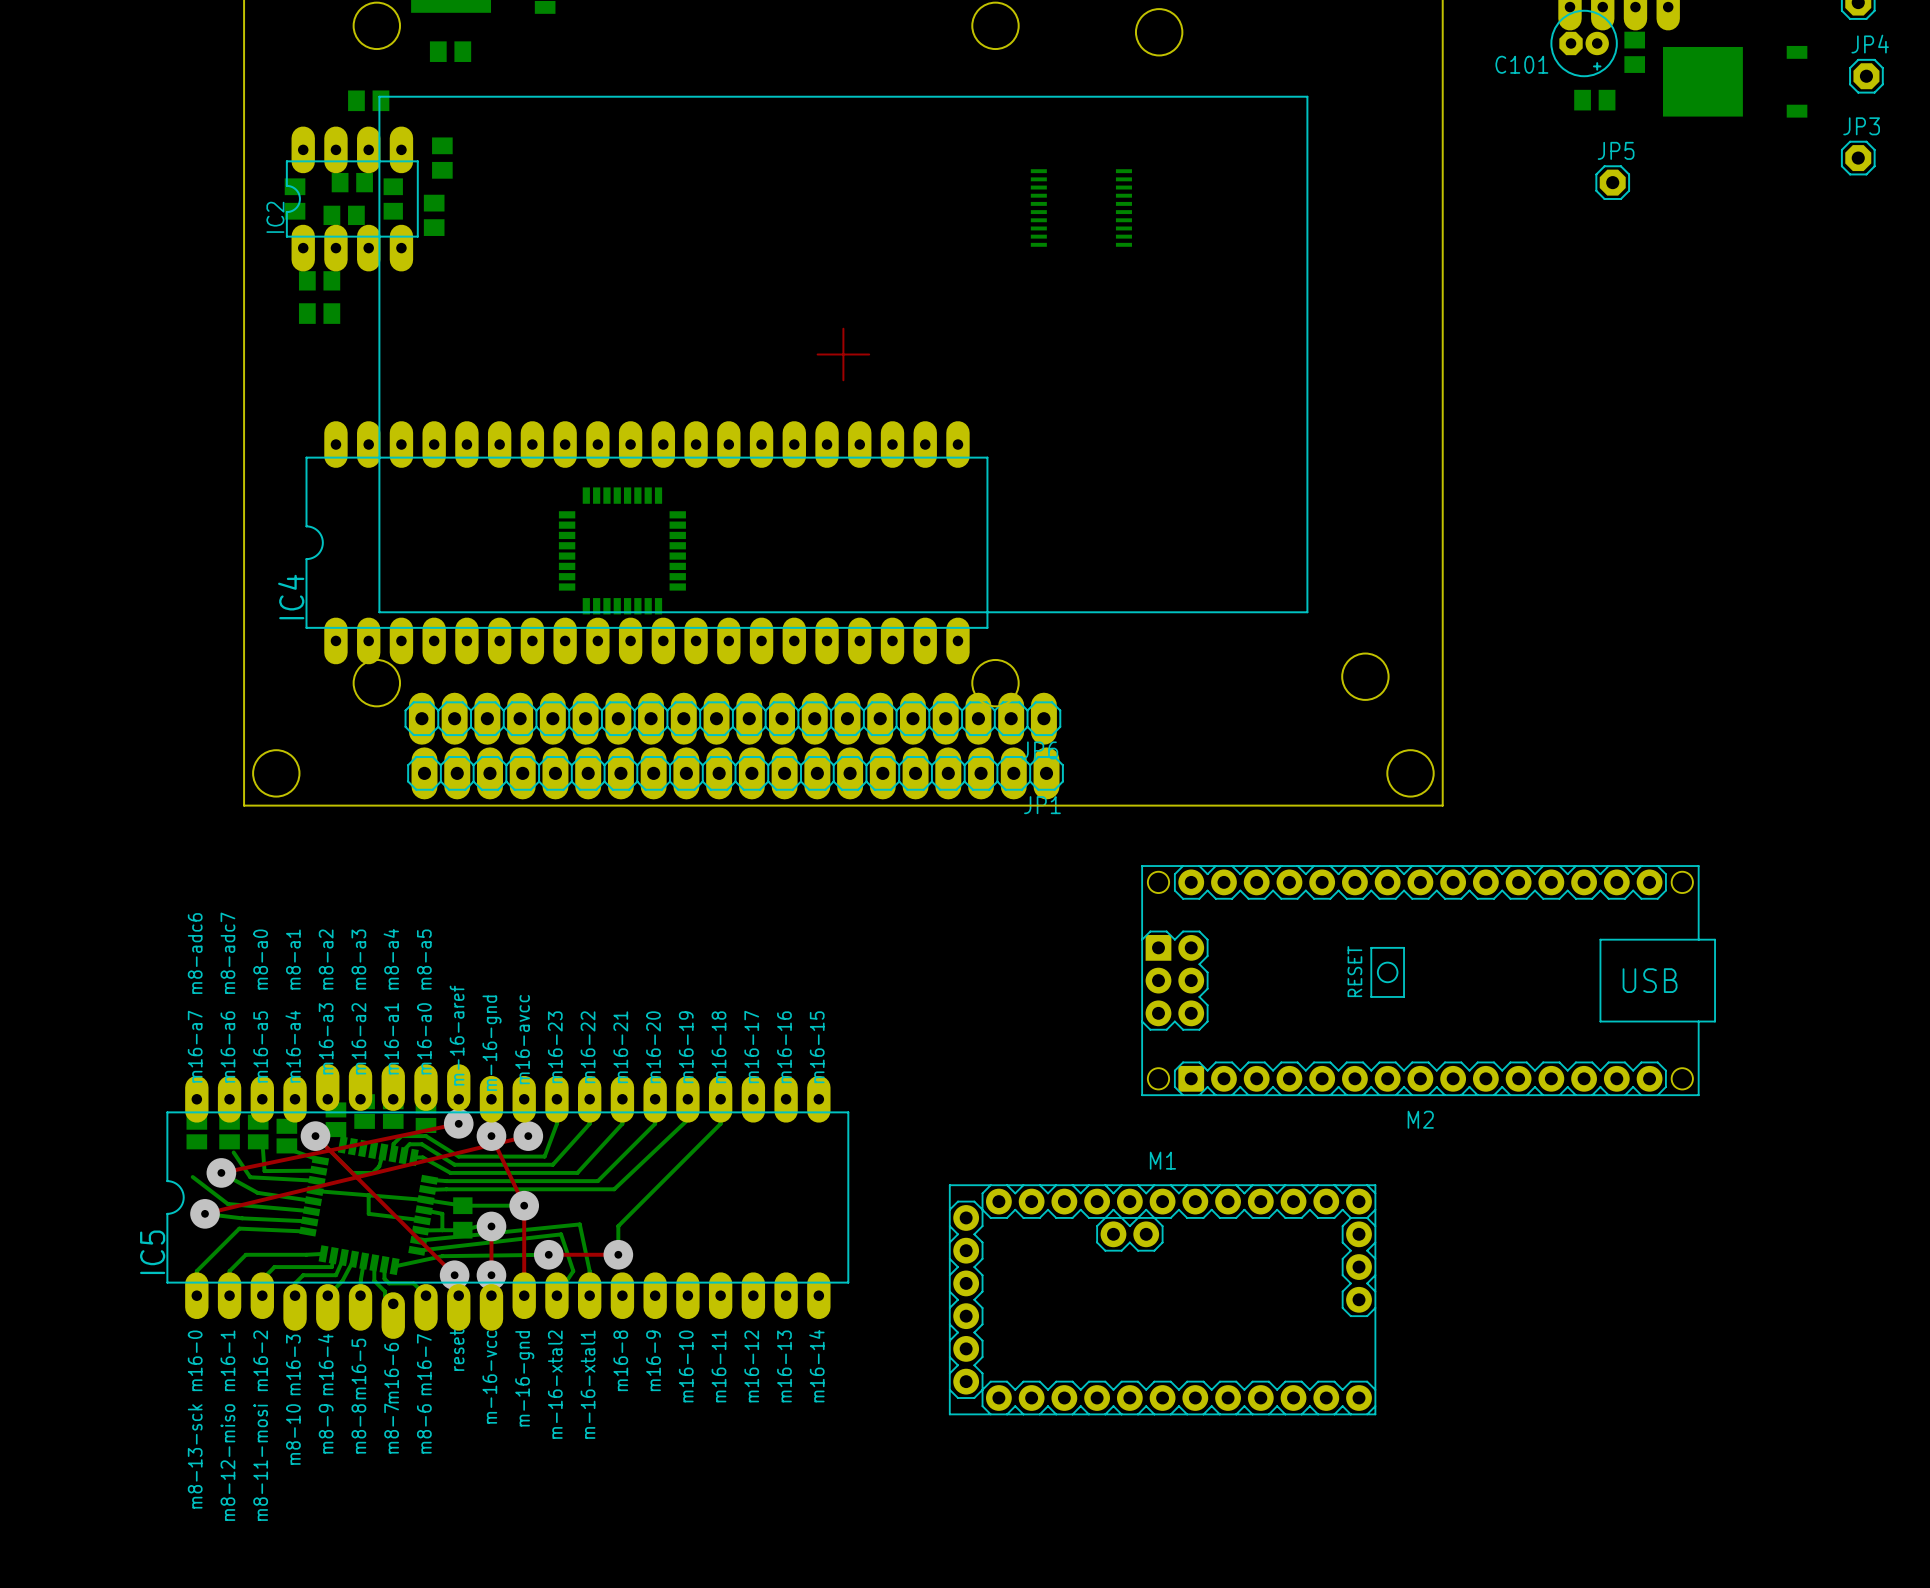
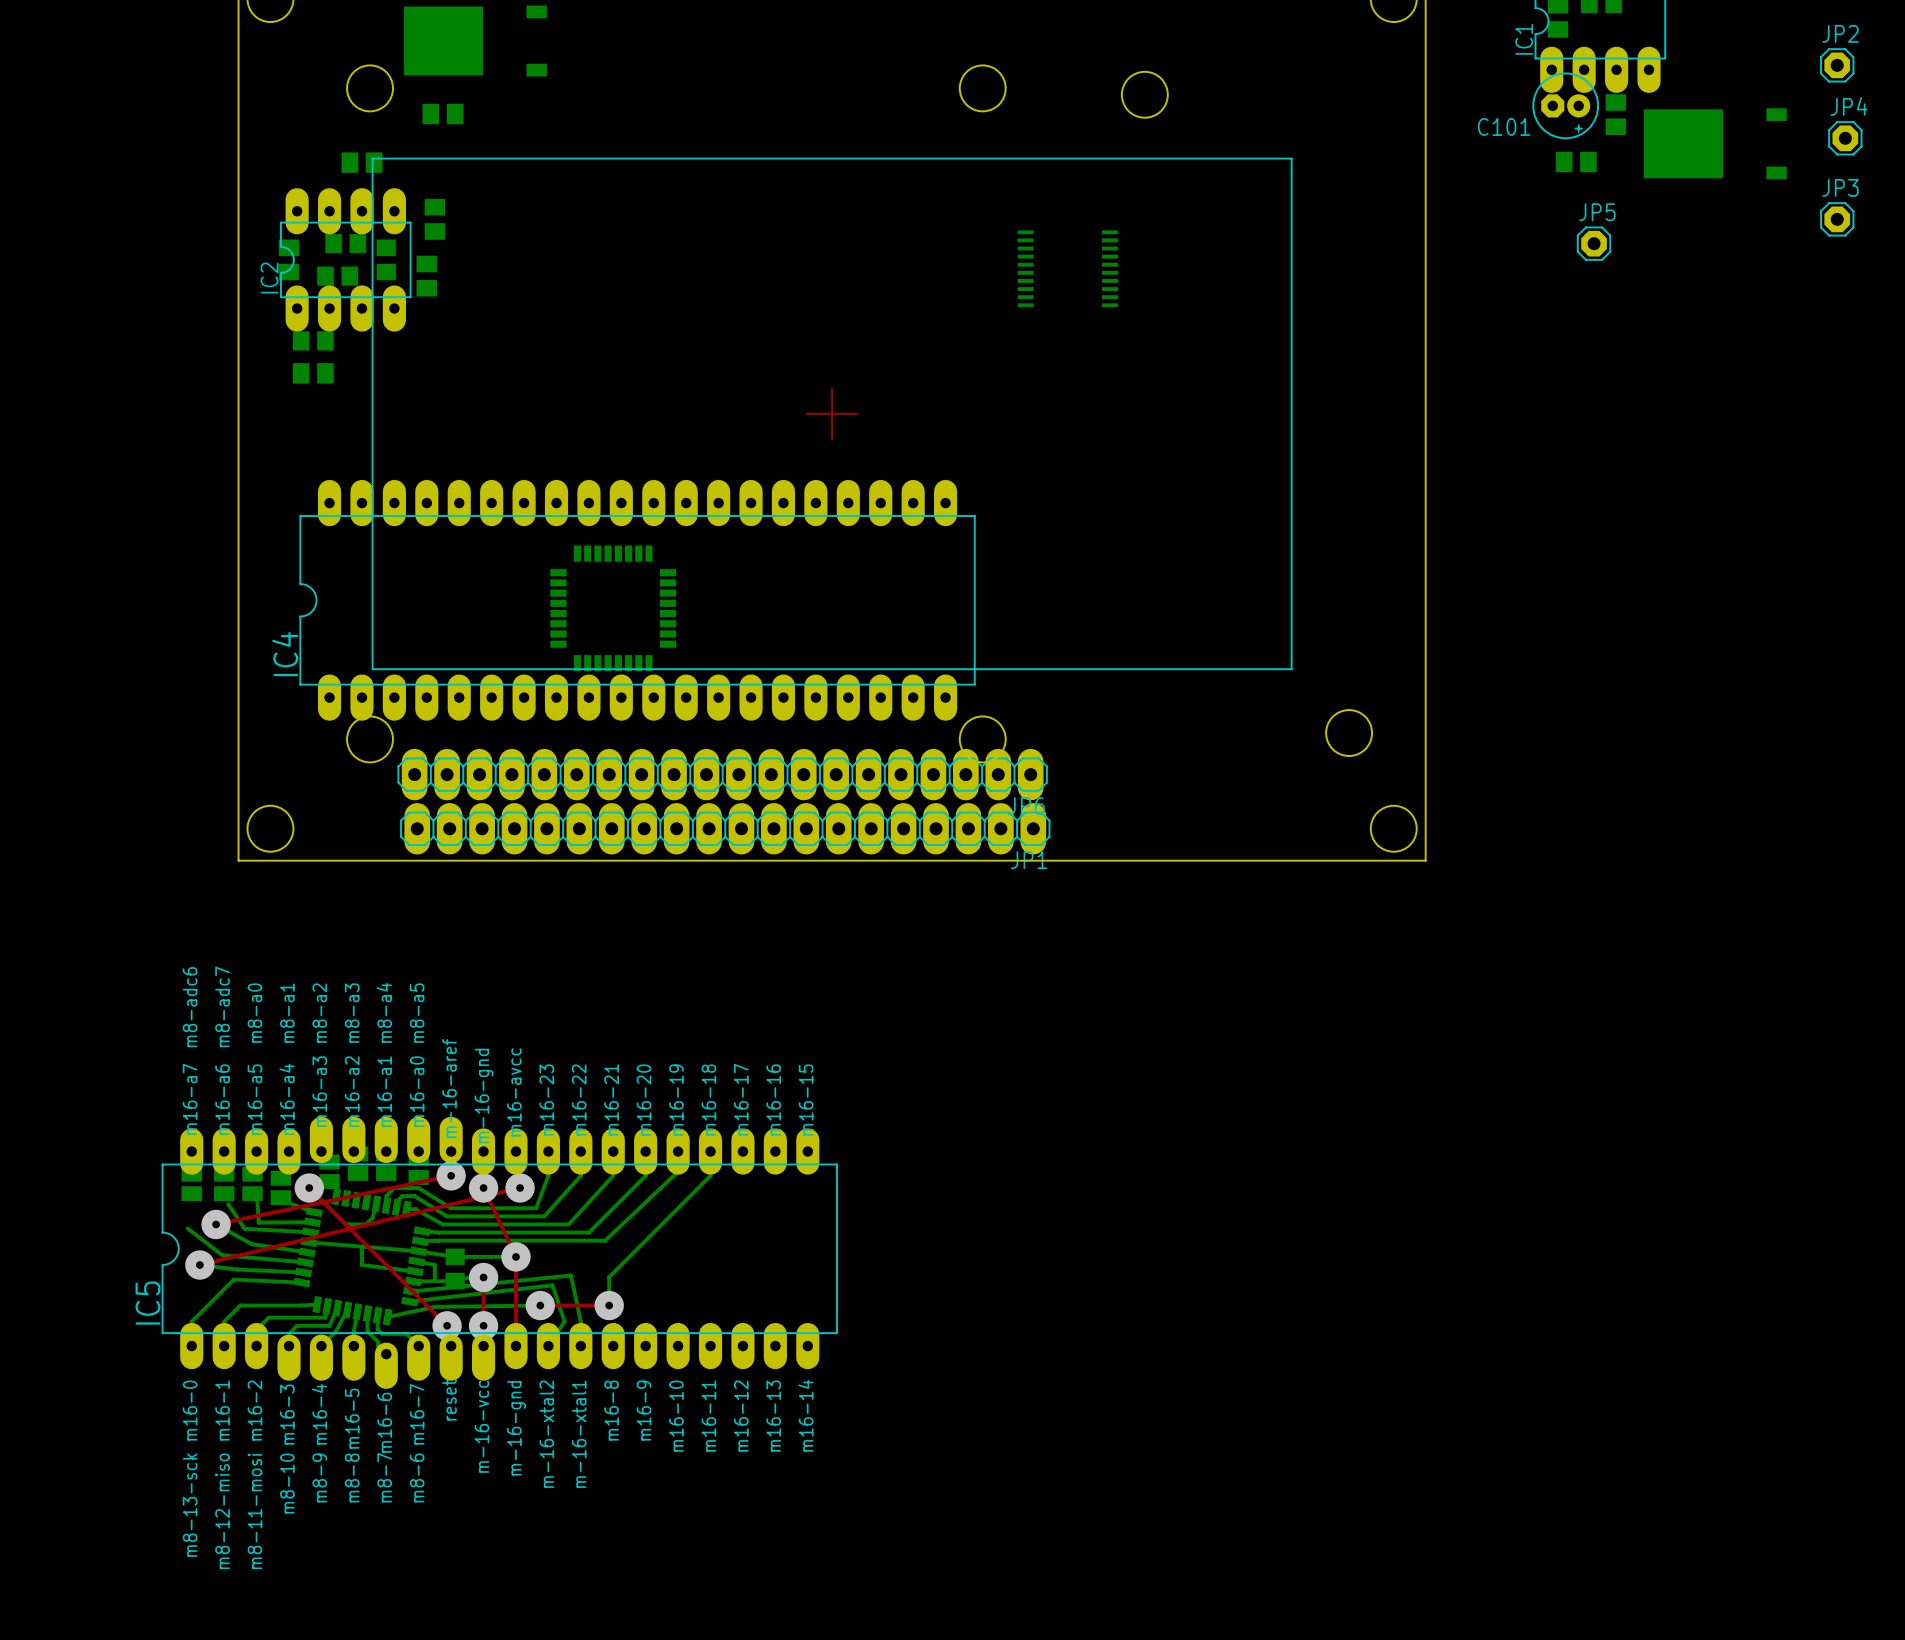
M2: (1428, 980) -> none
M1: (1162, 1299) -> none

